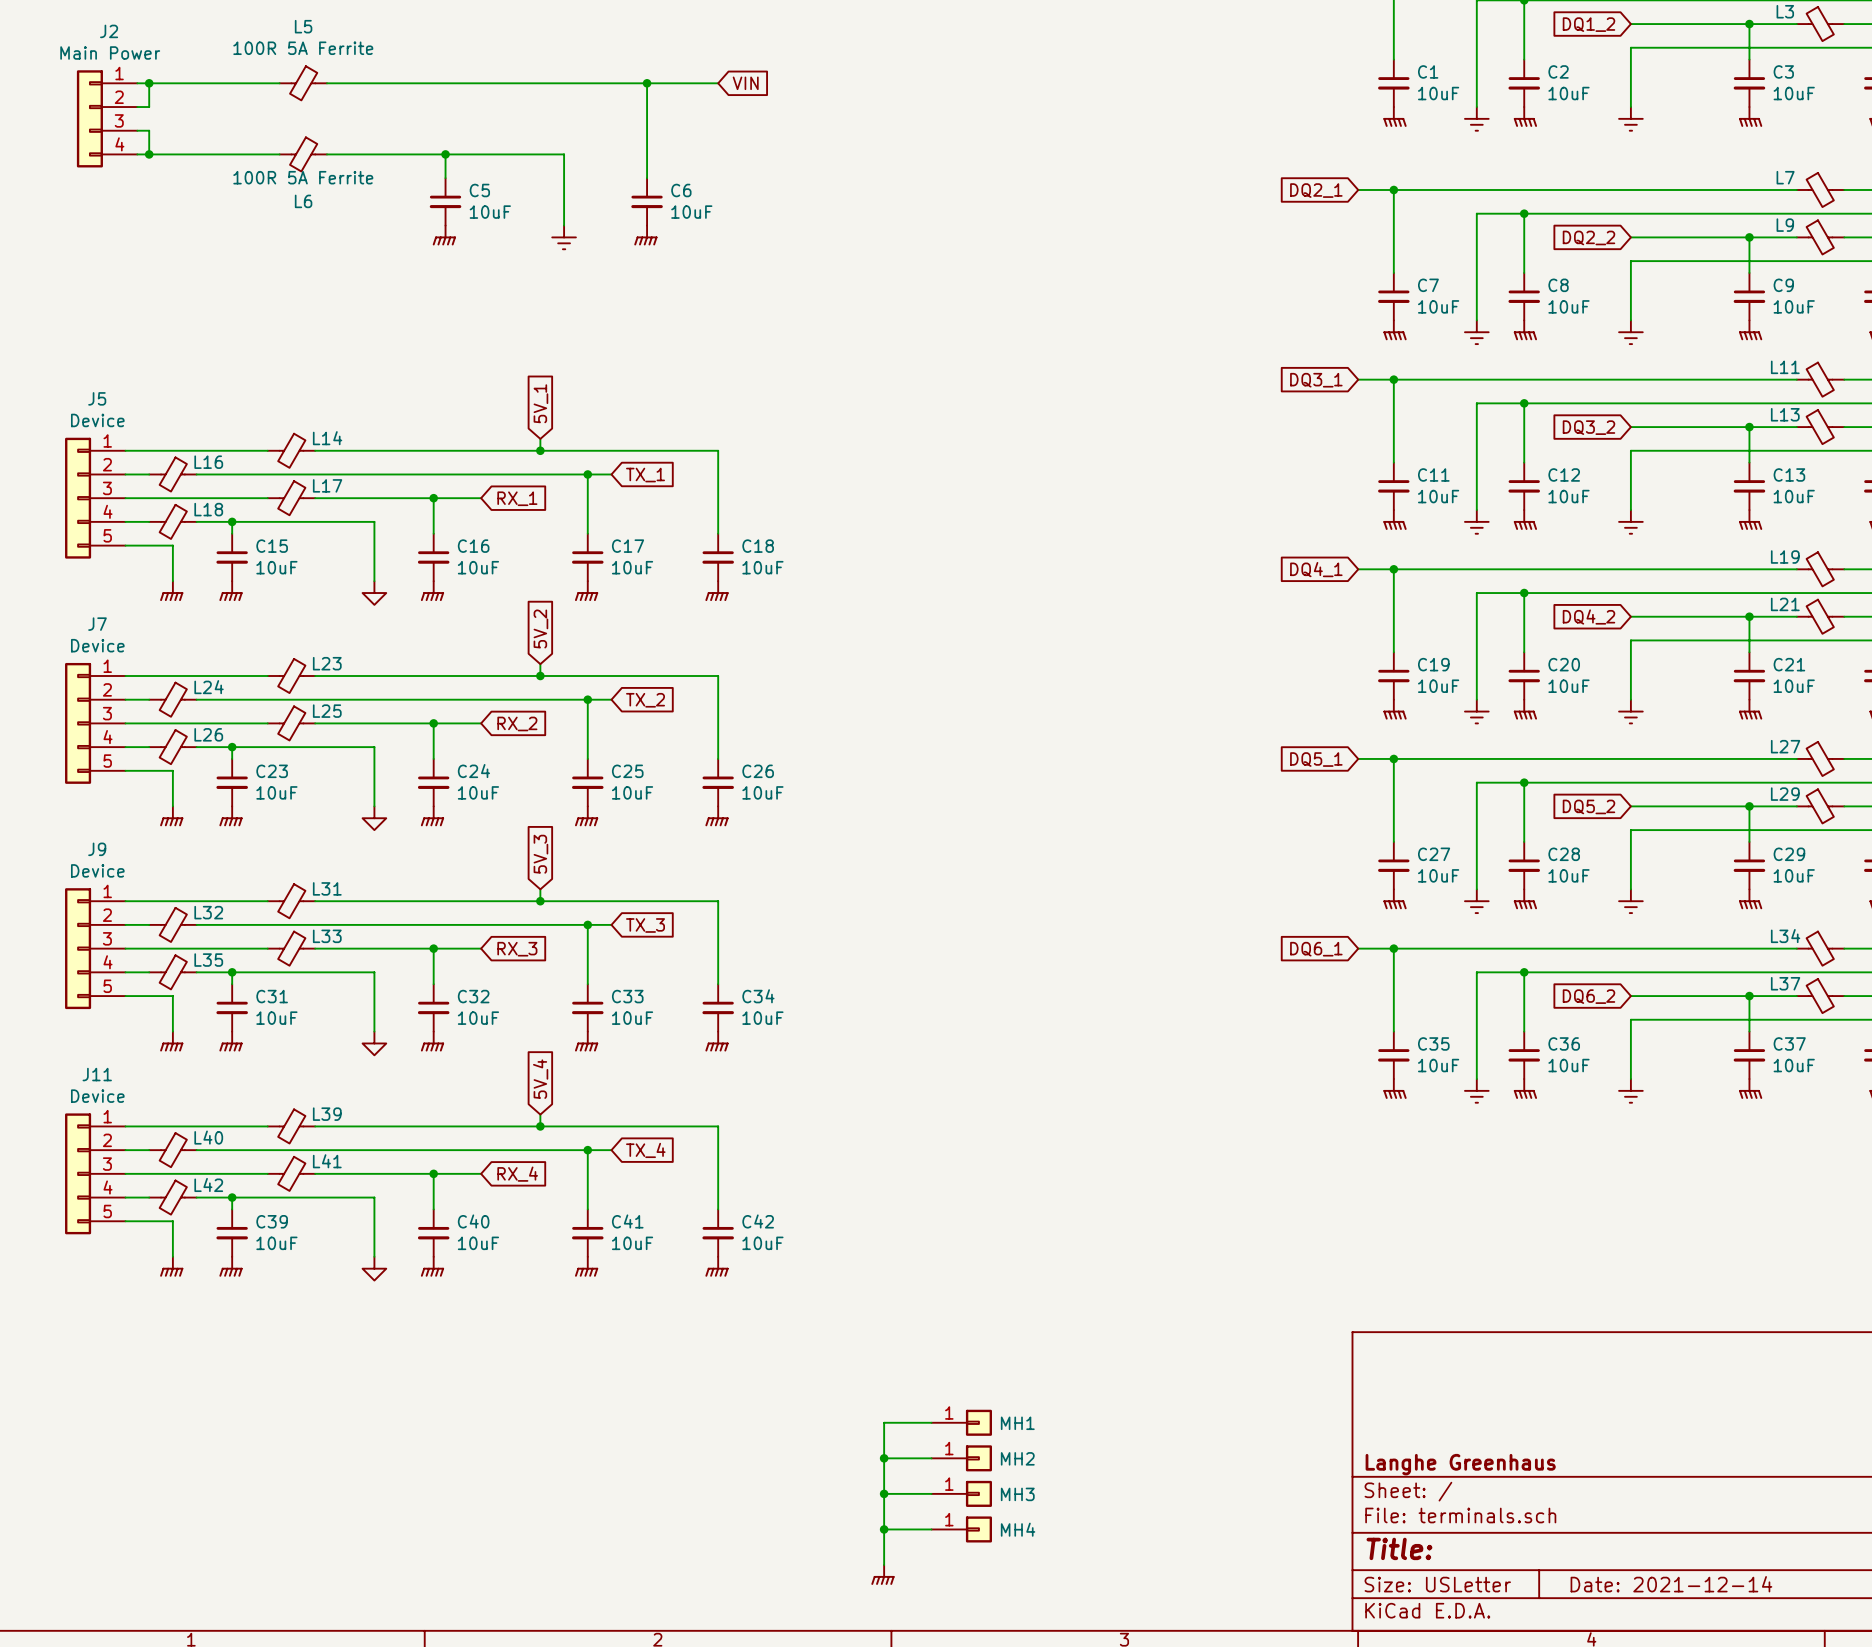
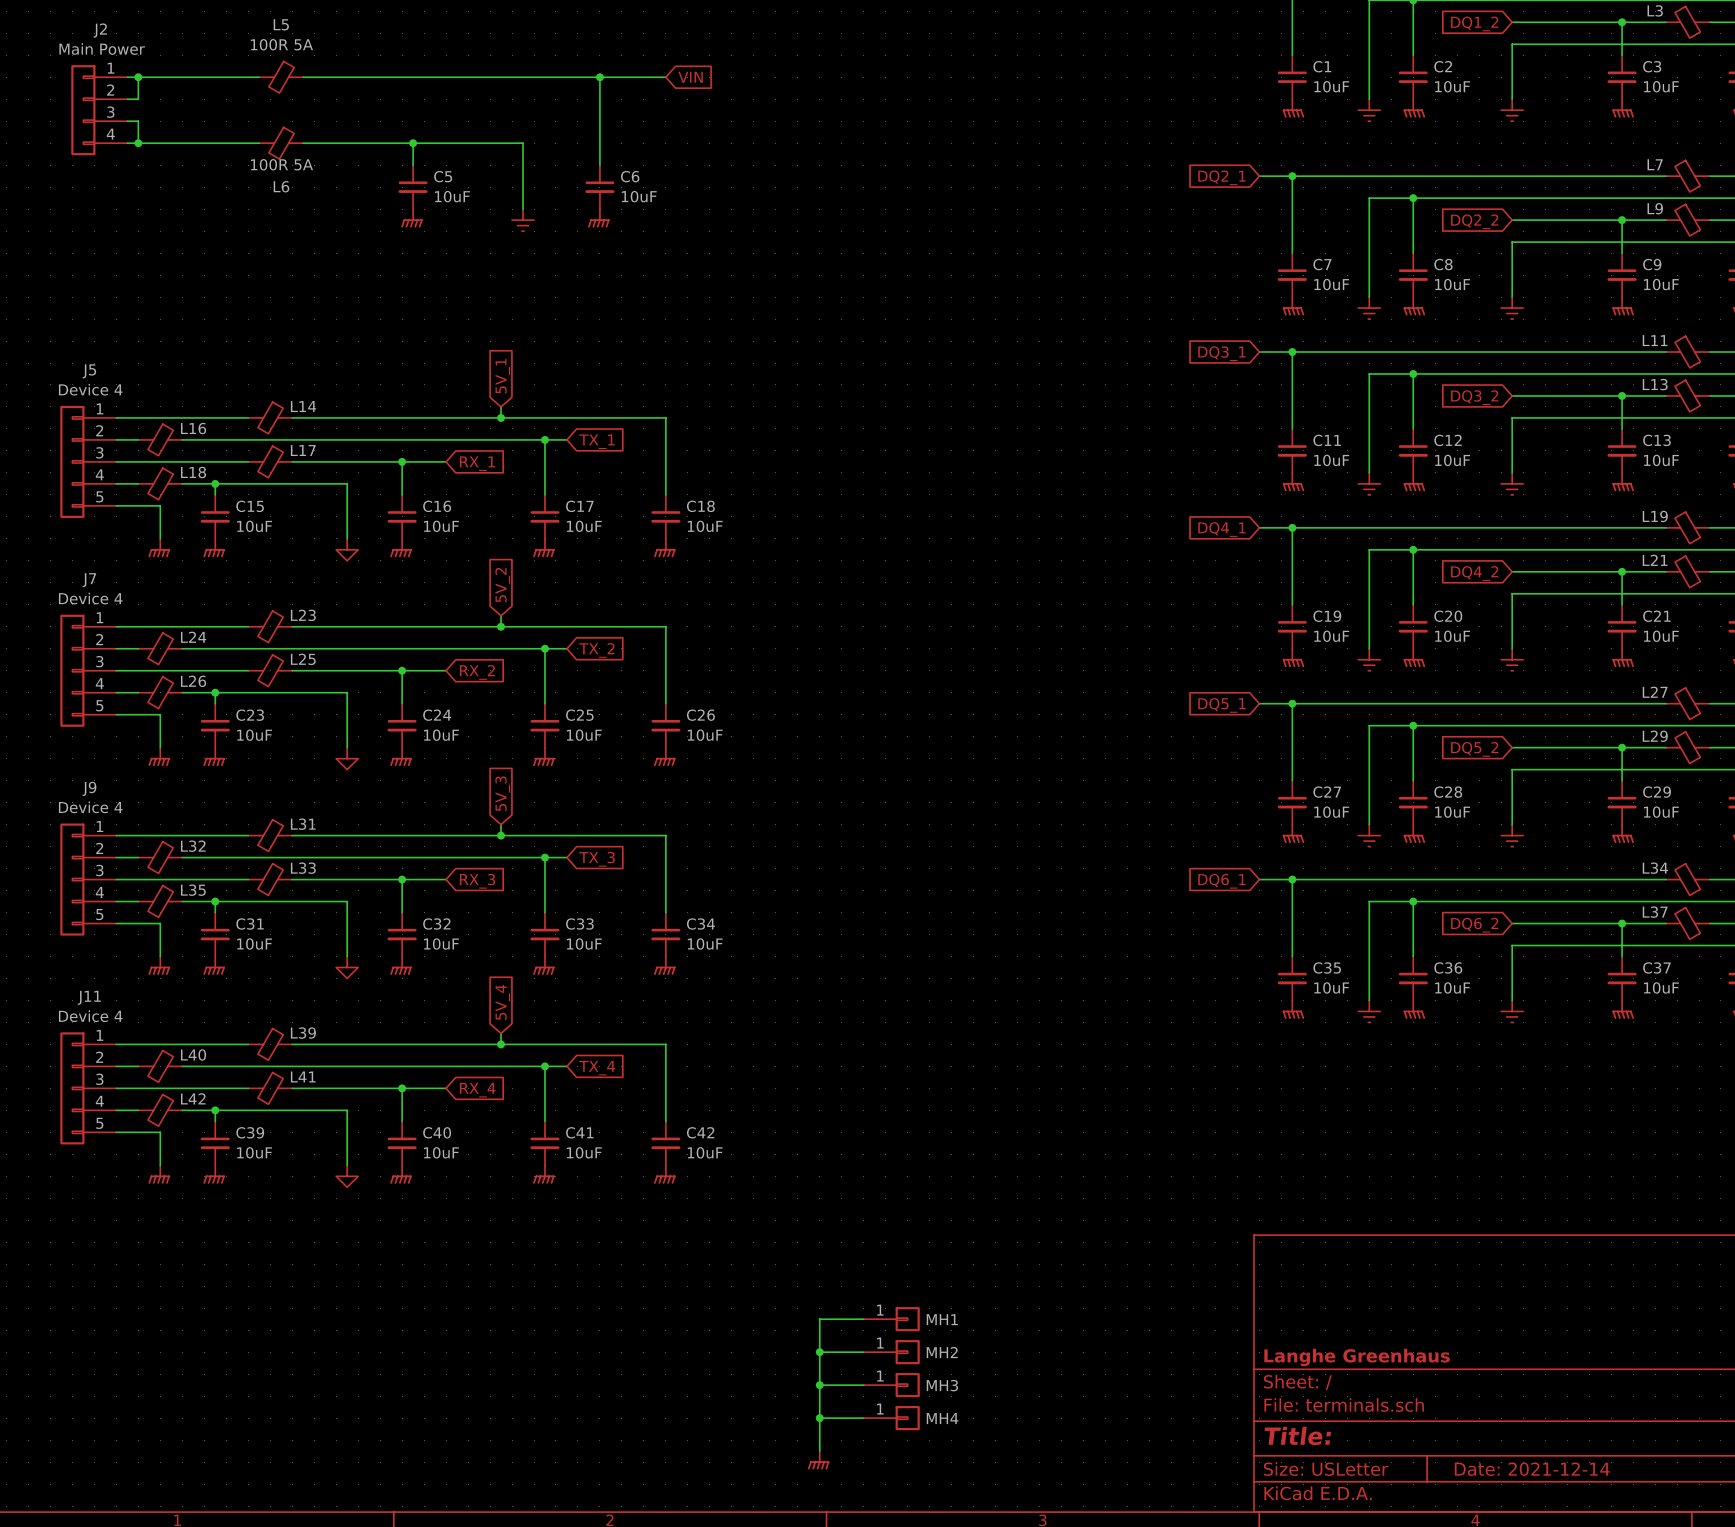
L5 value: 100R 5A Ferrite (303, 48) -> 100R 5A (281, 44)
L6 value: 100R 5A Ferrite (303, 177) -> 100R 5A (281, 164)
J5 value: Device (97, 420) -> Device 4 (90, 389)
J7 value: Device (97, 645) -> Device 4 (90, 598)
J9 value: Device (97, 870) -> Device 4 (90, 807)
J11 value: Device (97, 1096) -> Device 4 (90, 1016)

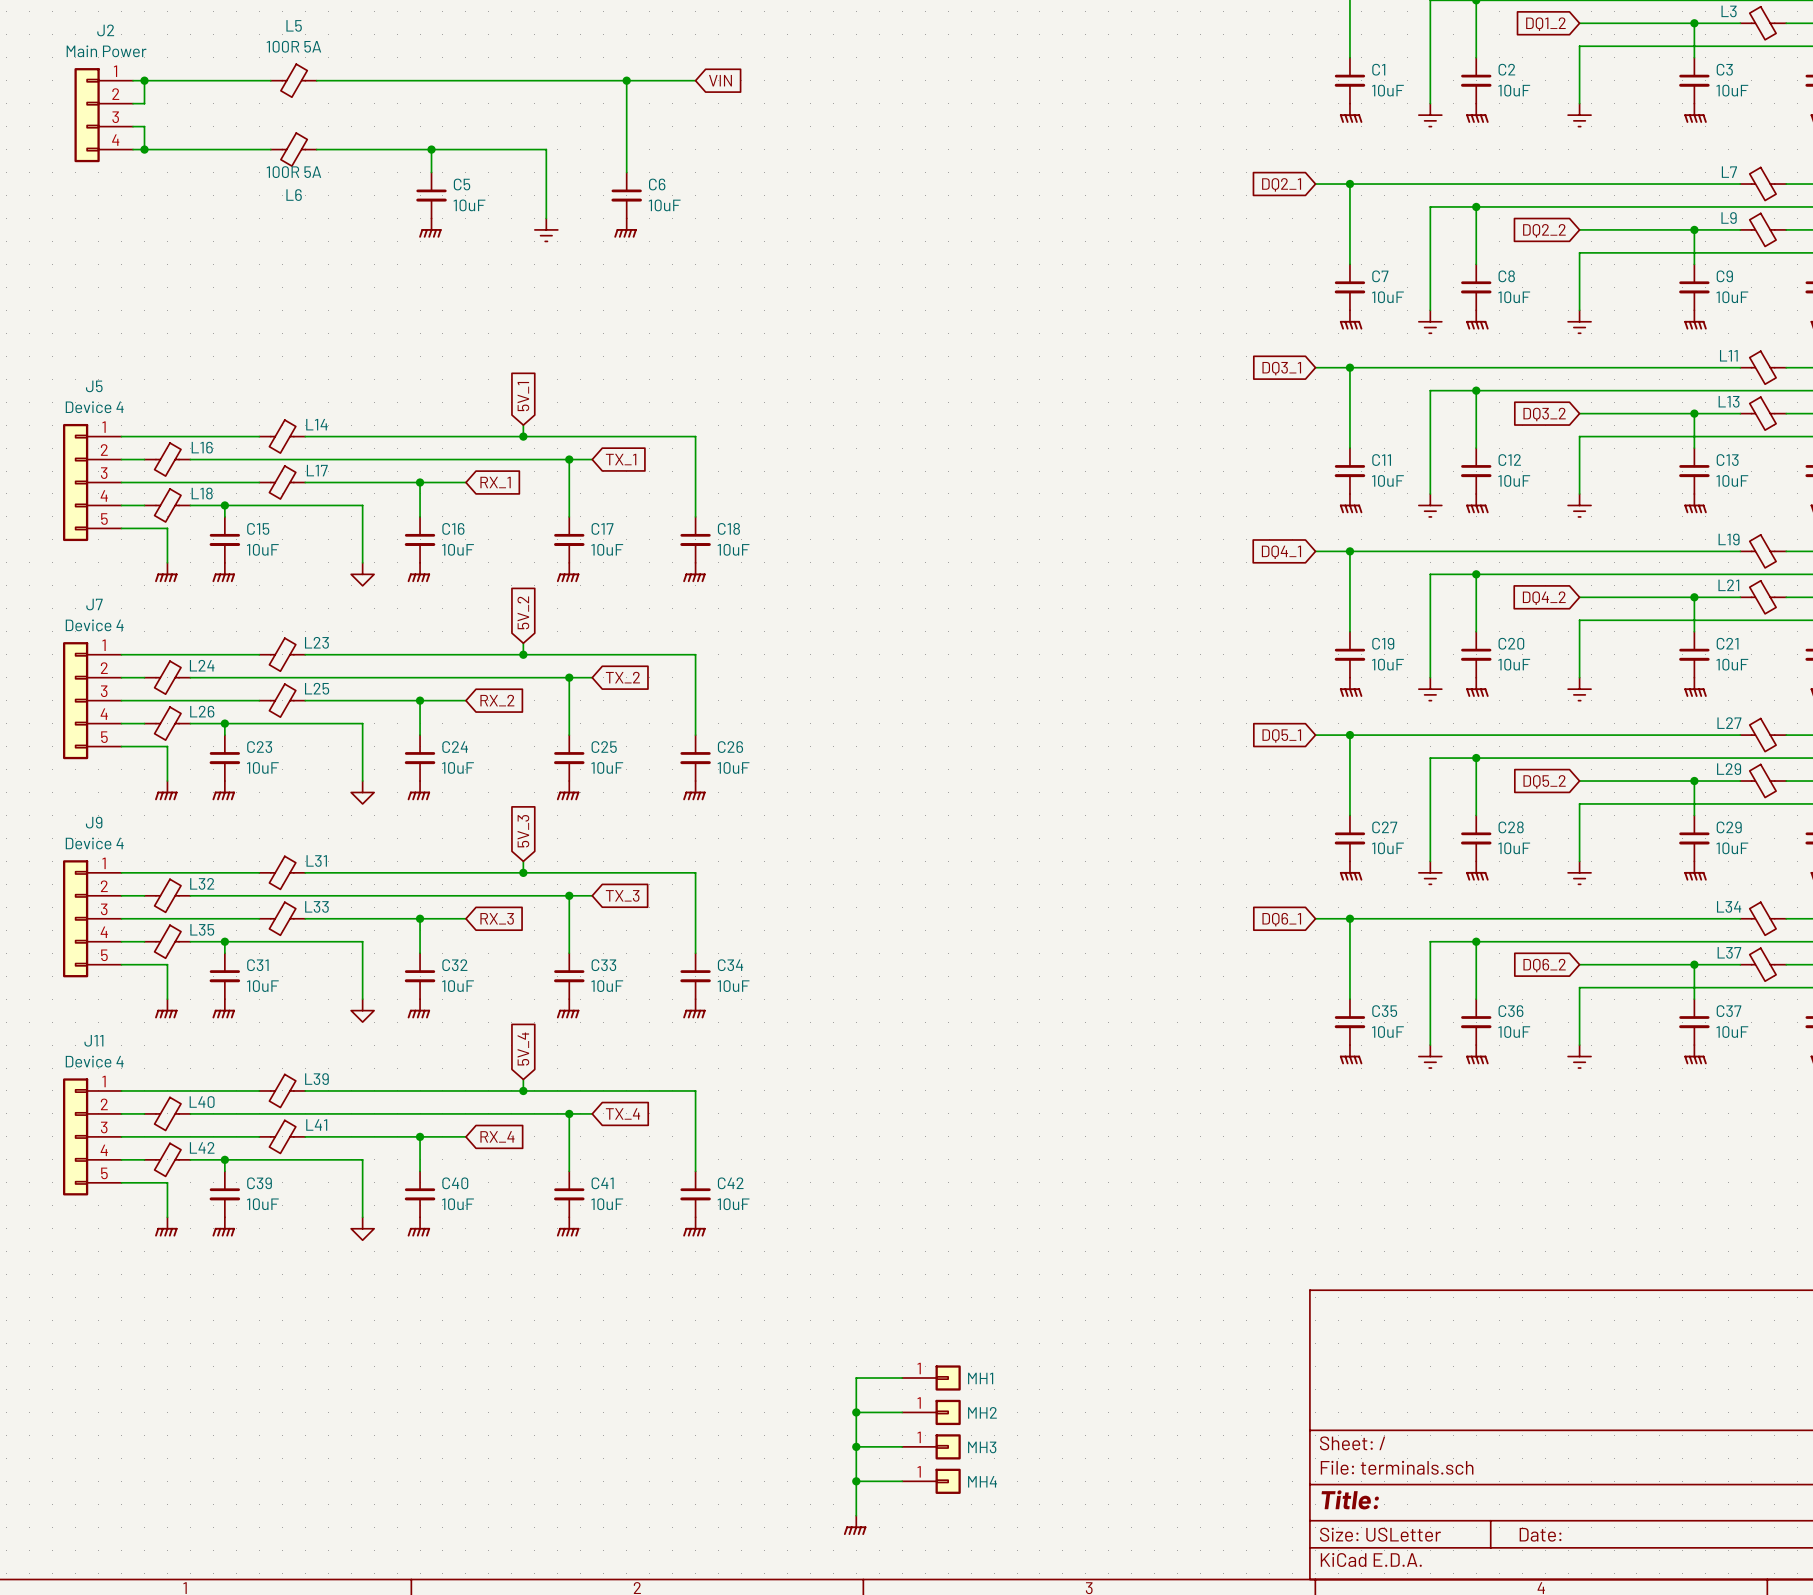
title block: Langhe Greenhaus (1357, 1357) -> none
title block: Date: 2021-12-14 (1532, 1469) -> Date: (1540, 1534)

